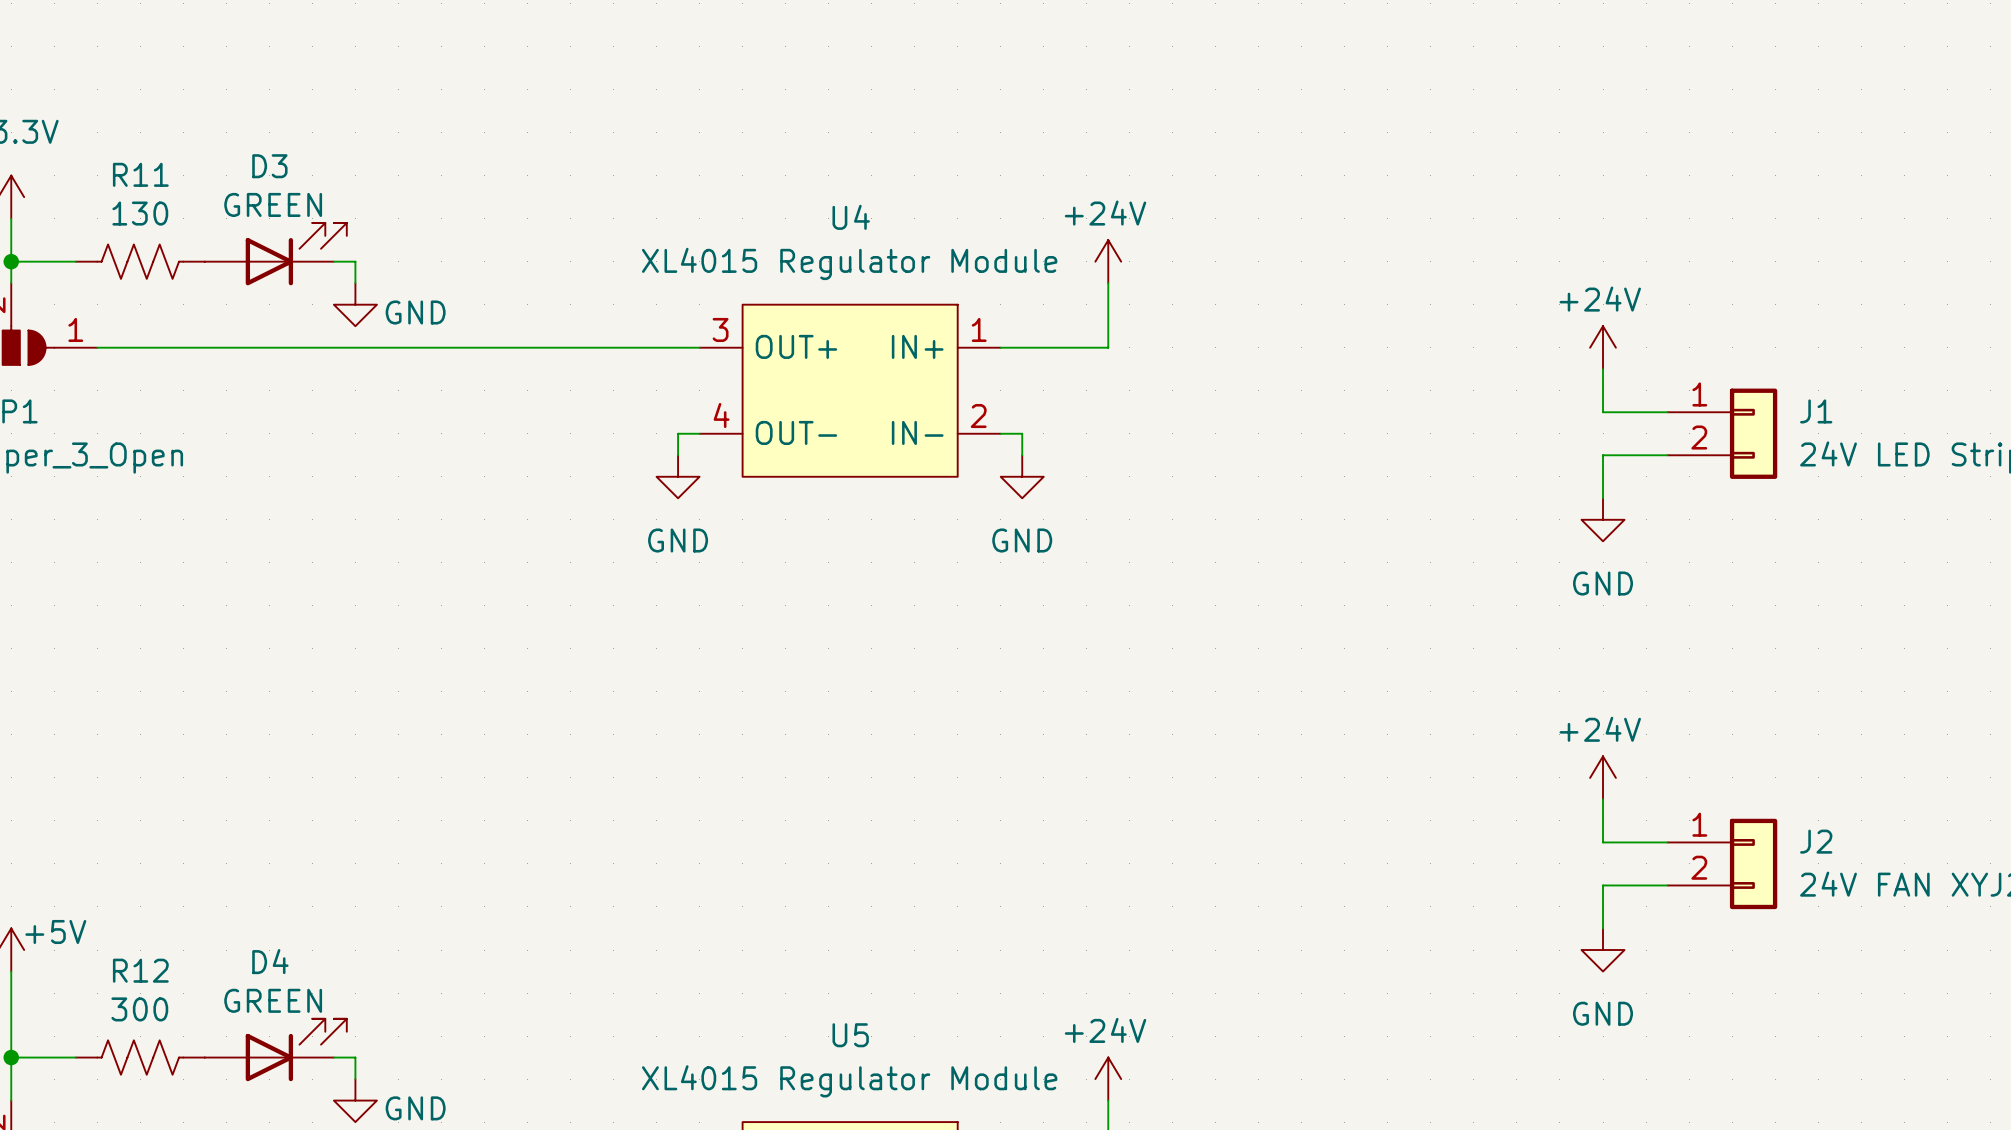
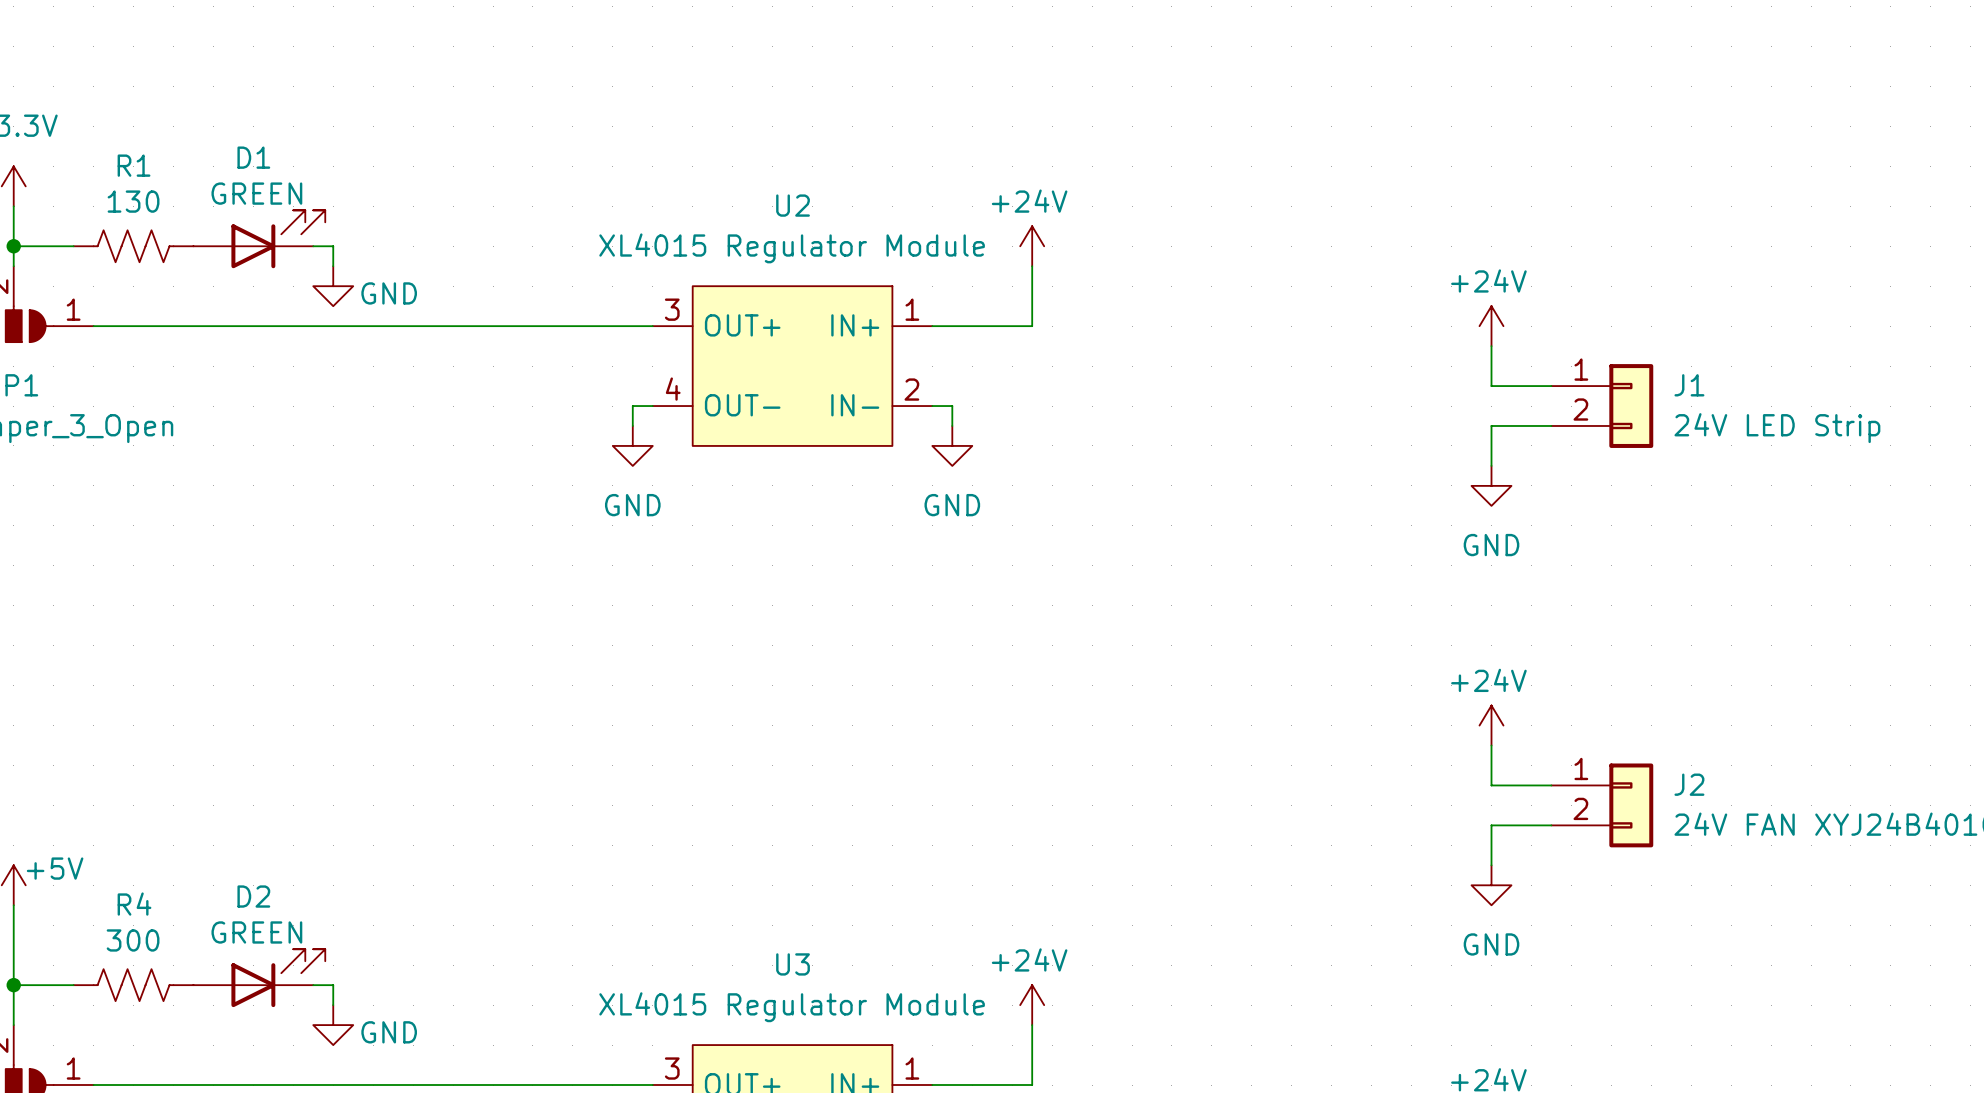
D3 name: D3 (269, 166) -> D1 (253, 157)
R11 name: R11 (140, 174) -> R1 (134, 165)
U4 name: U4 (851, 217) -> U2 (793, 205)
D4 name: D4 (270, 961) -> D2 (253, 896)
R12 name: R12 (140, 970) -> R4 (134, 904)
U5 name: U5 (850, 1035) -> U3 (793, 964)

